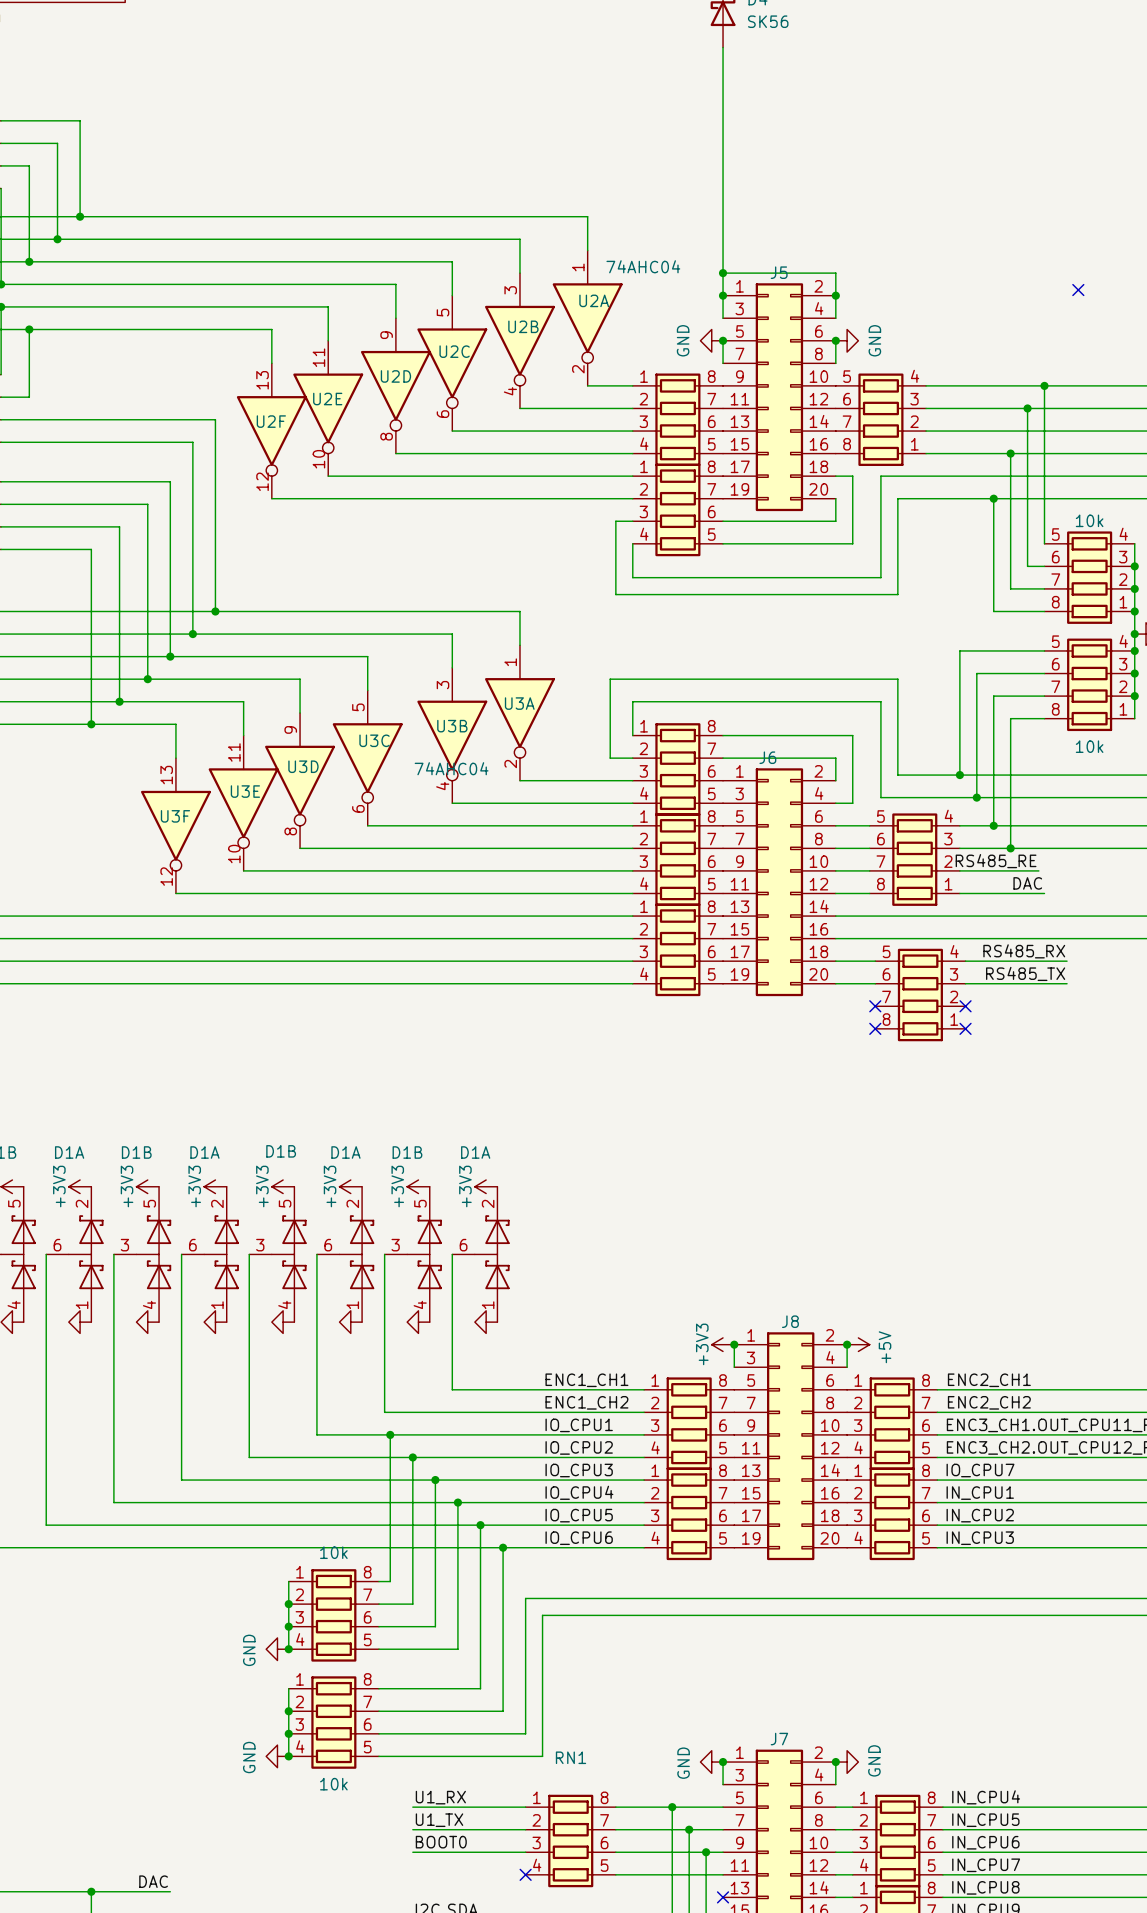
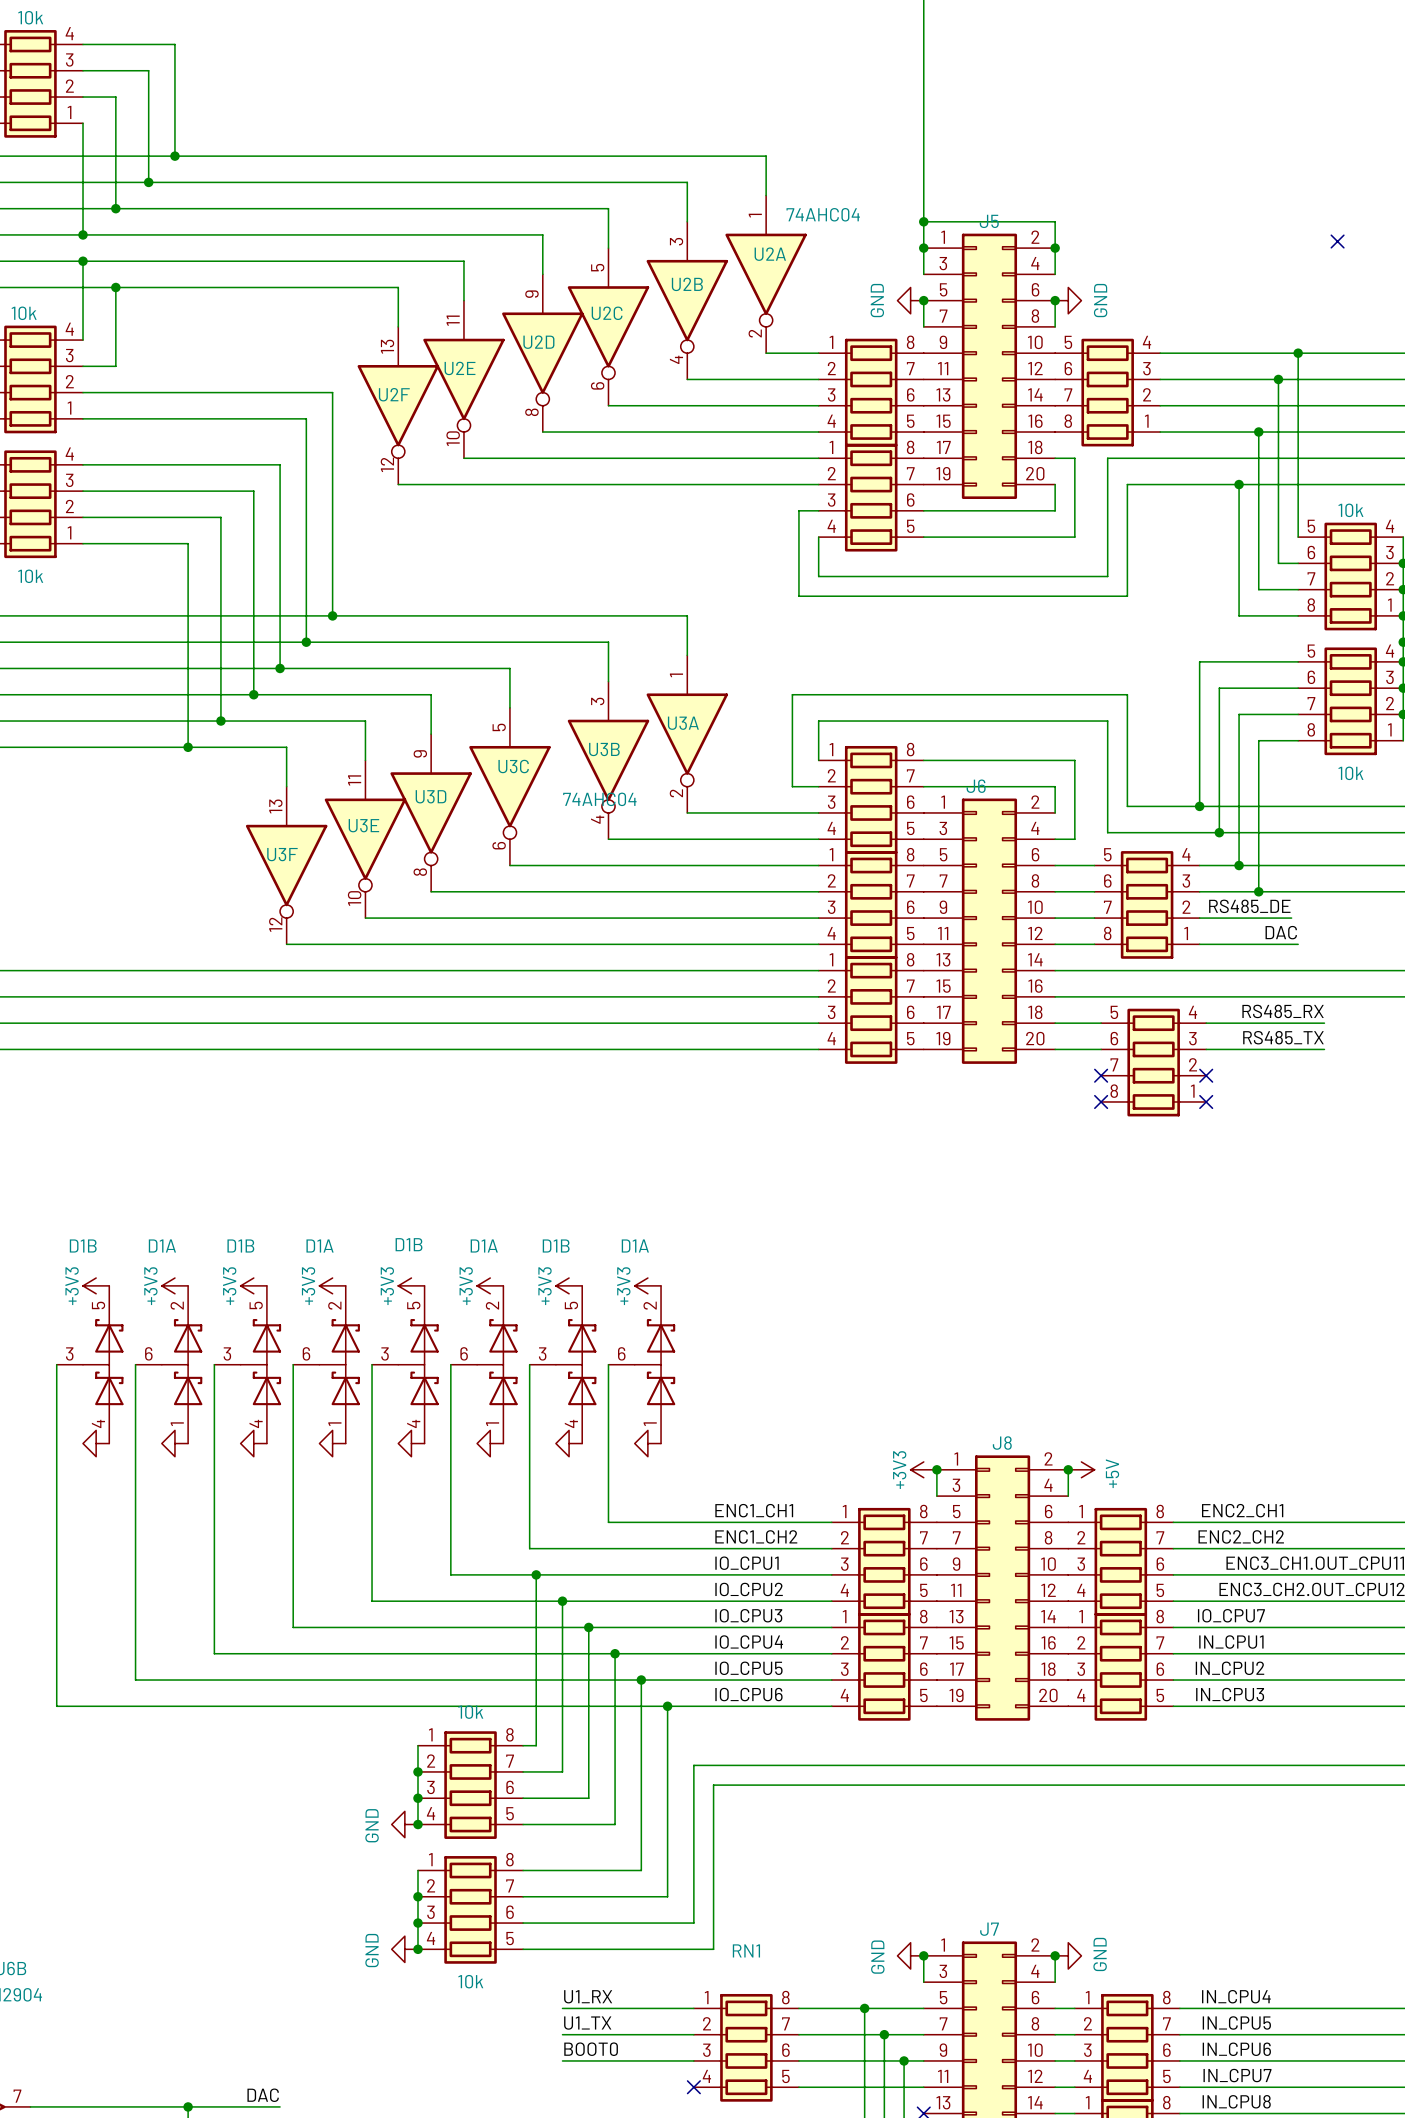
label: RS485_RE (996, 861) -> RS485_DE (1249, 906)

